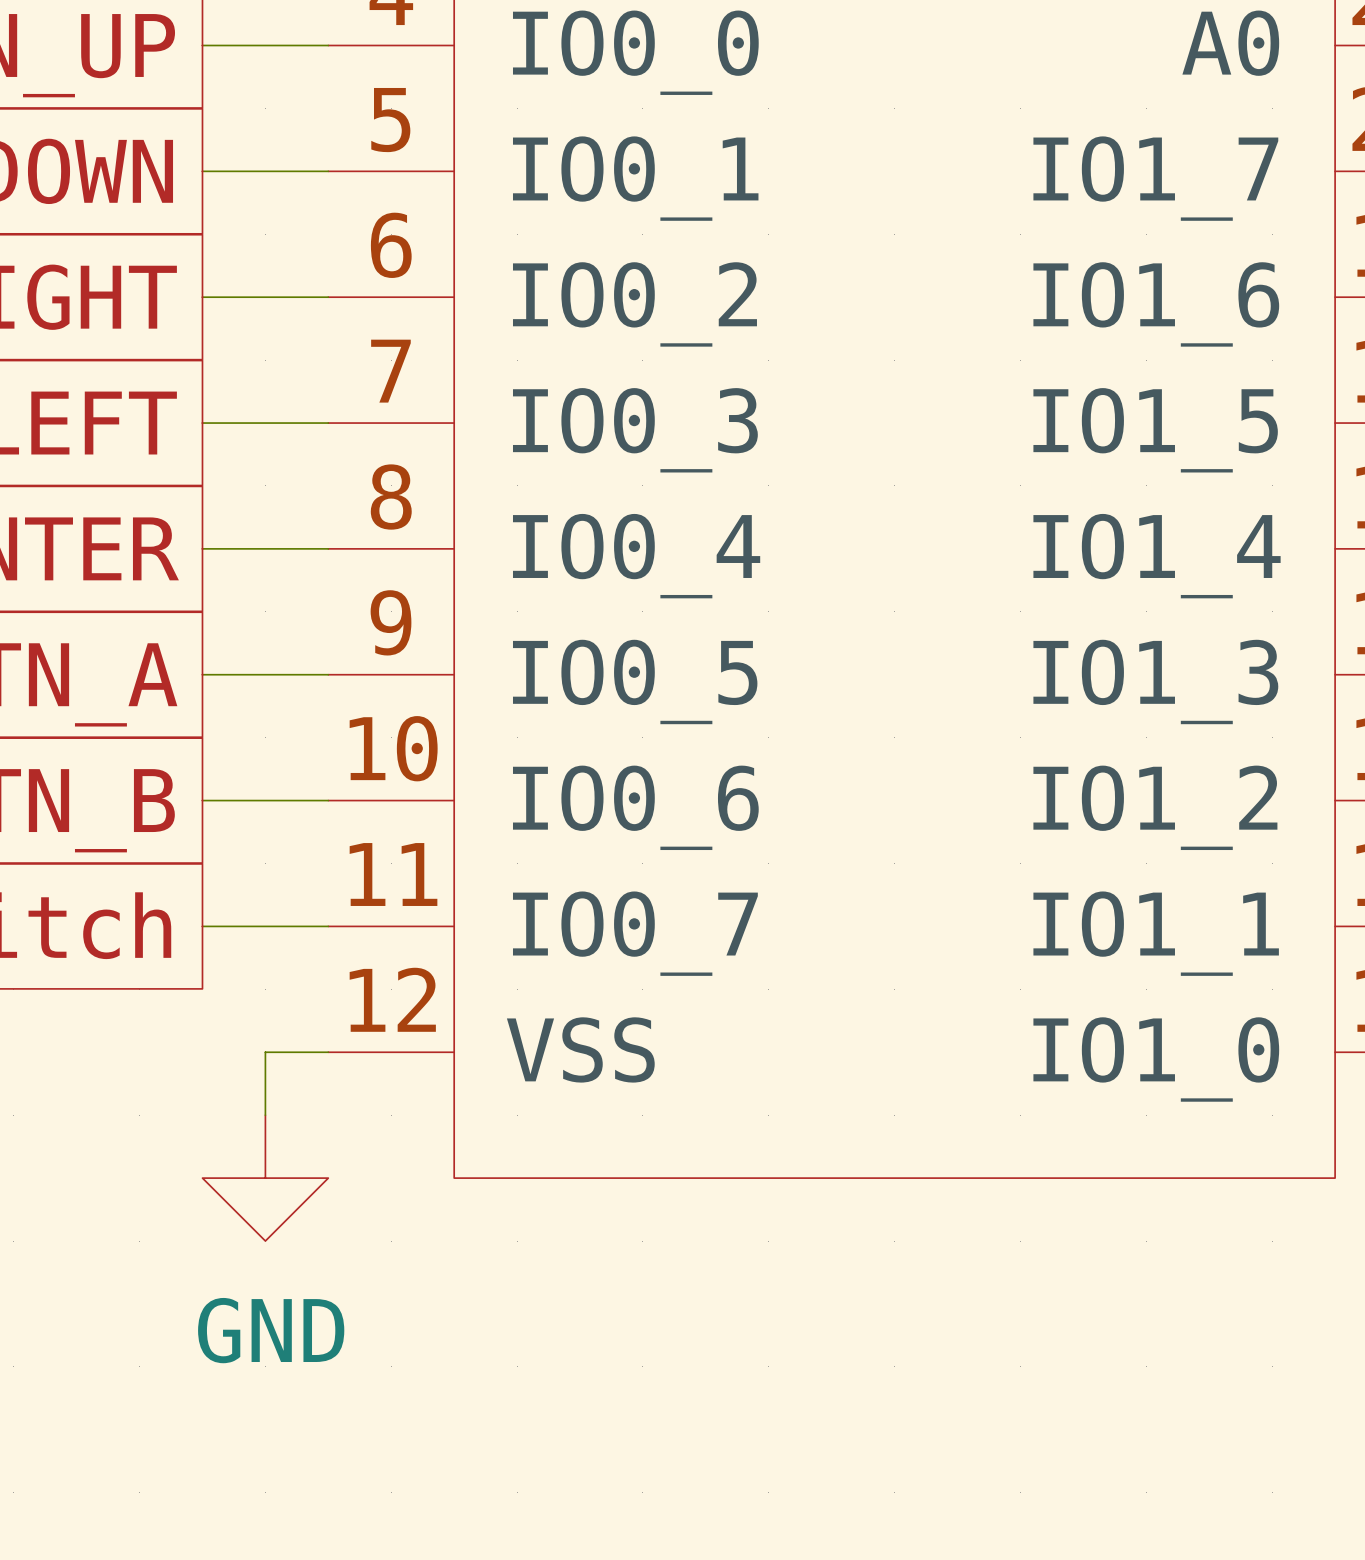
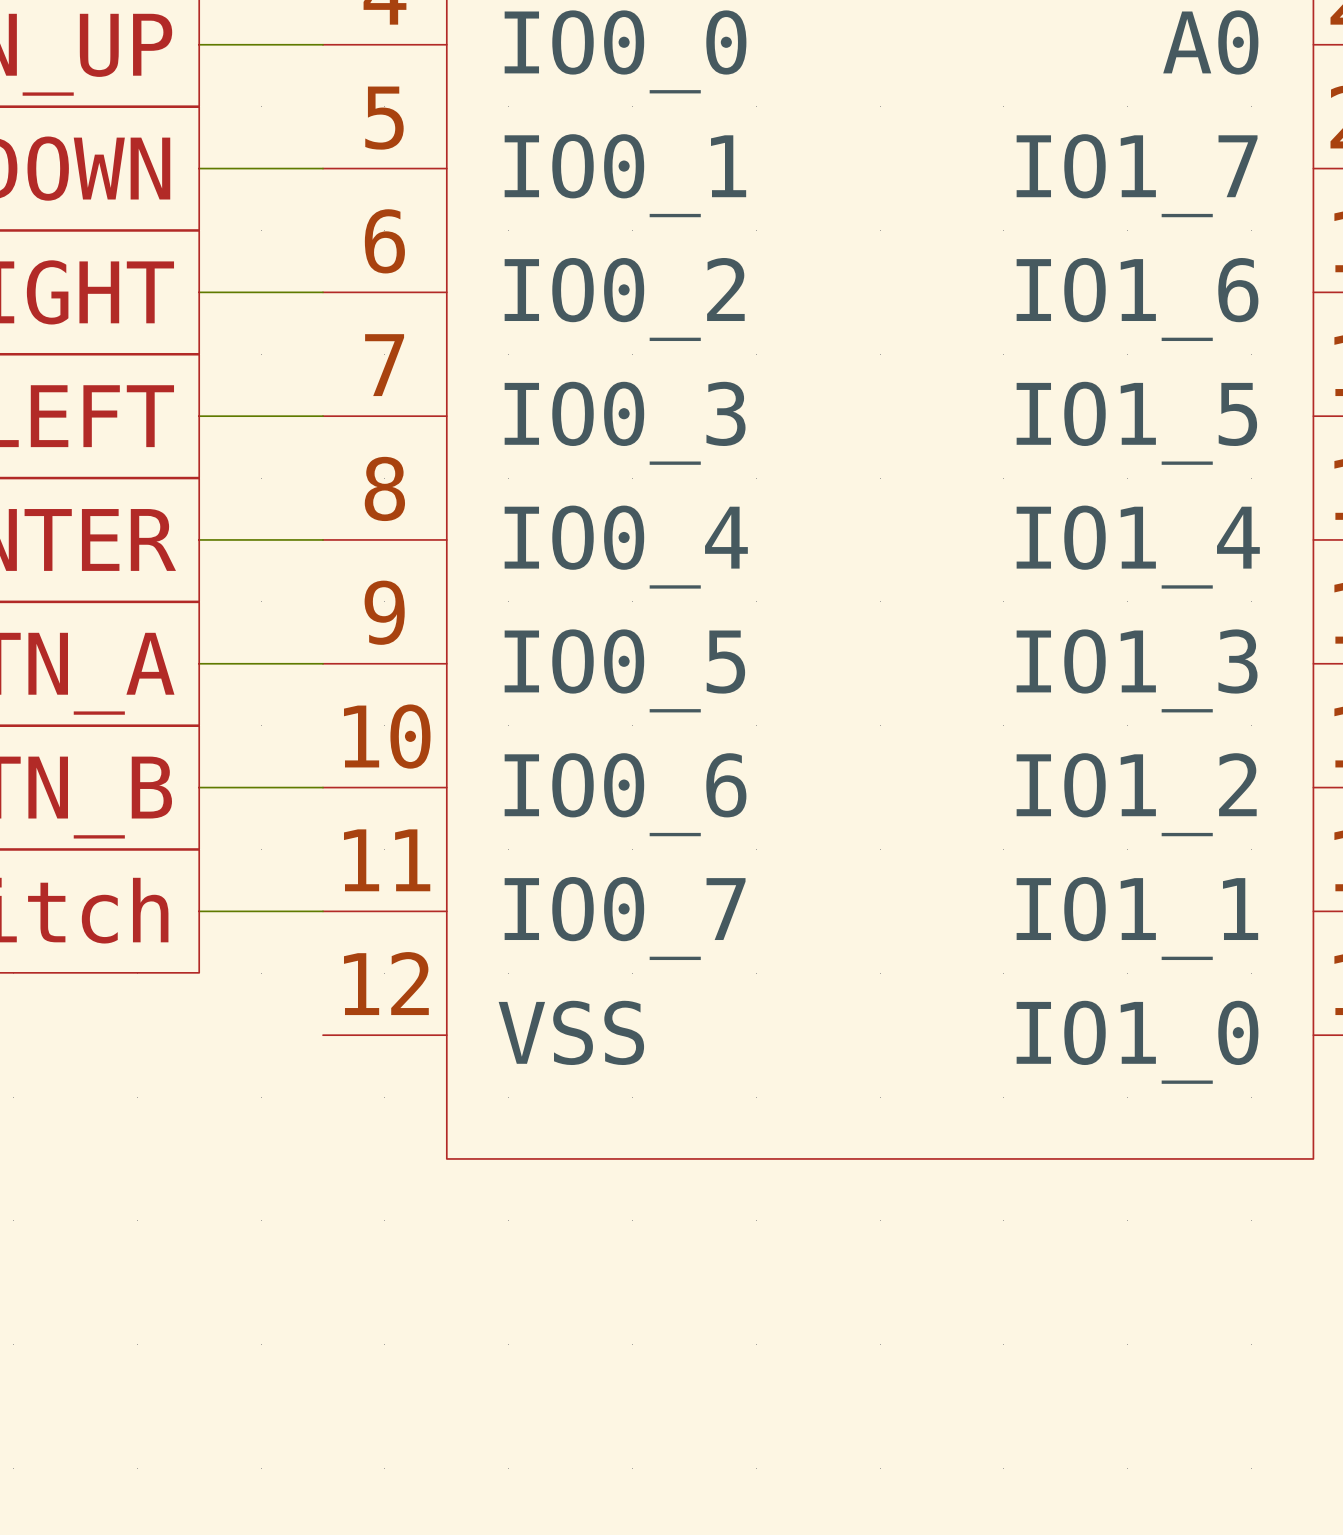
wire: (328, 1052) (265, 1052) (265, 1115) -> none
power symbol: GND (265, 1178) -> none

